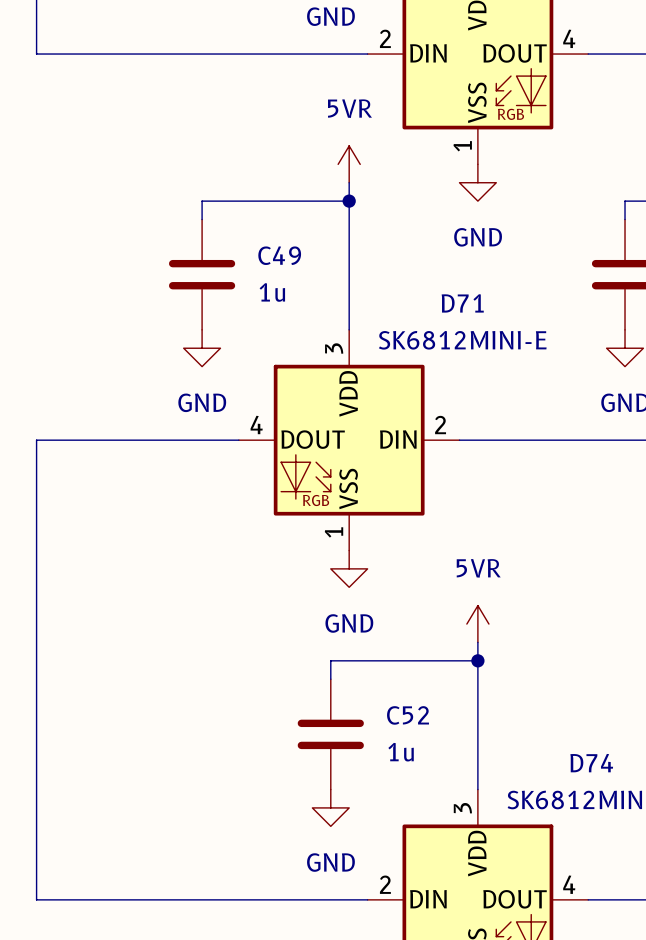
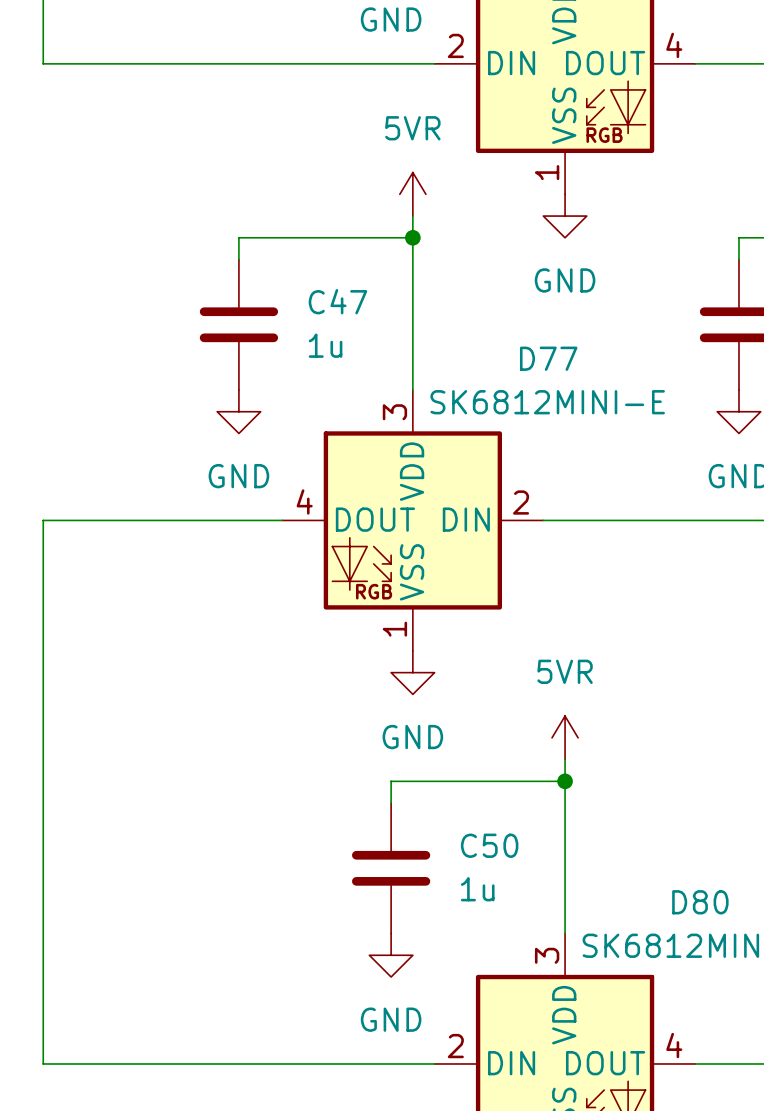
C49 name: C49 (279, 255) -> C47 (337, 301)
D71 name: D71 (462, 303) -> D77 (548, 358)
C52 name: C52 (408, 715) -> C50 (489, 845)
D74 name: D74 (591, 763) -> D80 (700, 902)

